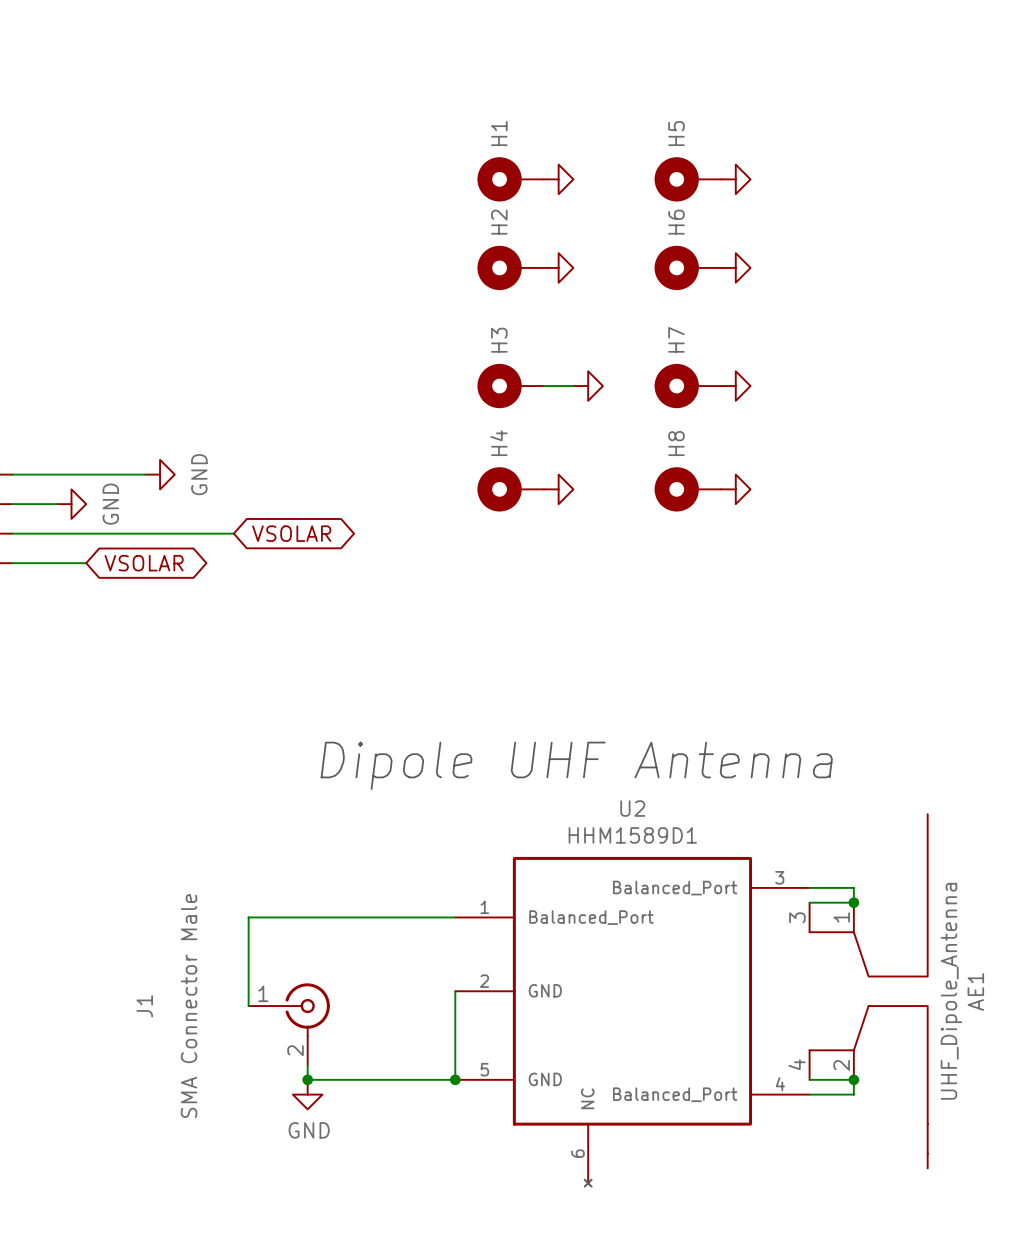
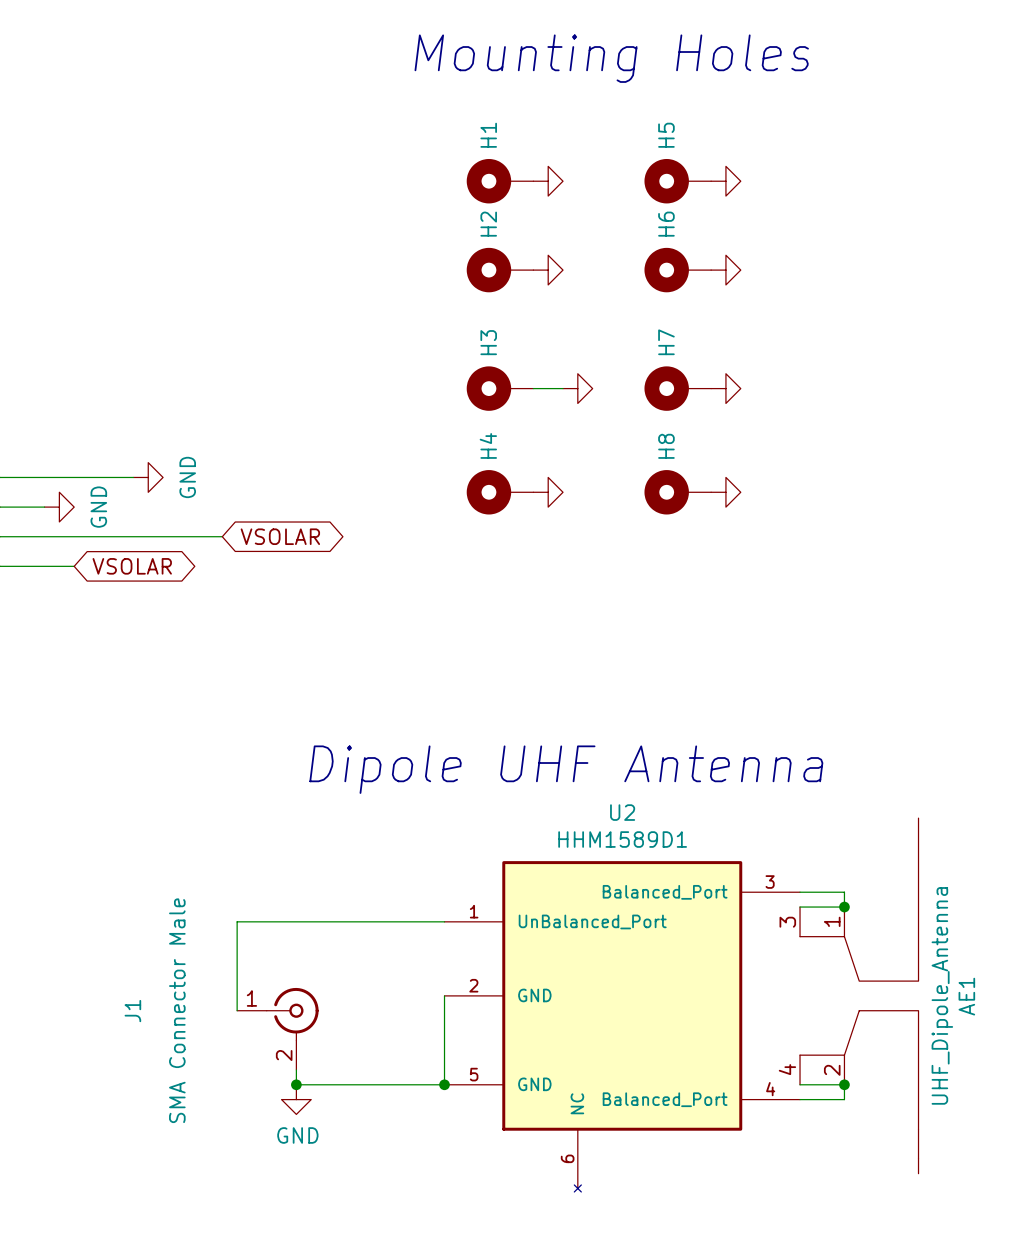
text: none -> Mounting Holes (611, 58)
U2 pin name: Balanced_Port (591, 917) -> UnBalanced_Port (592, 921)

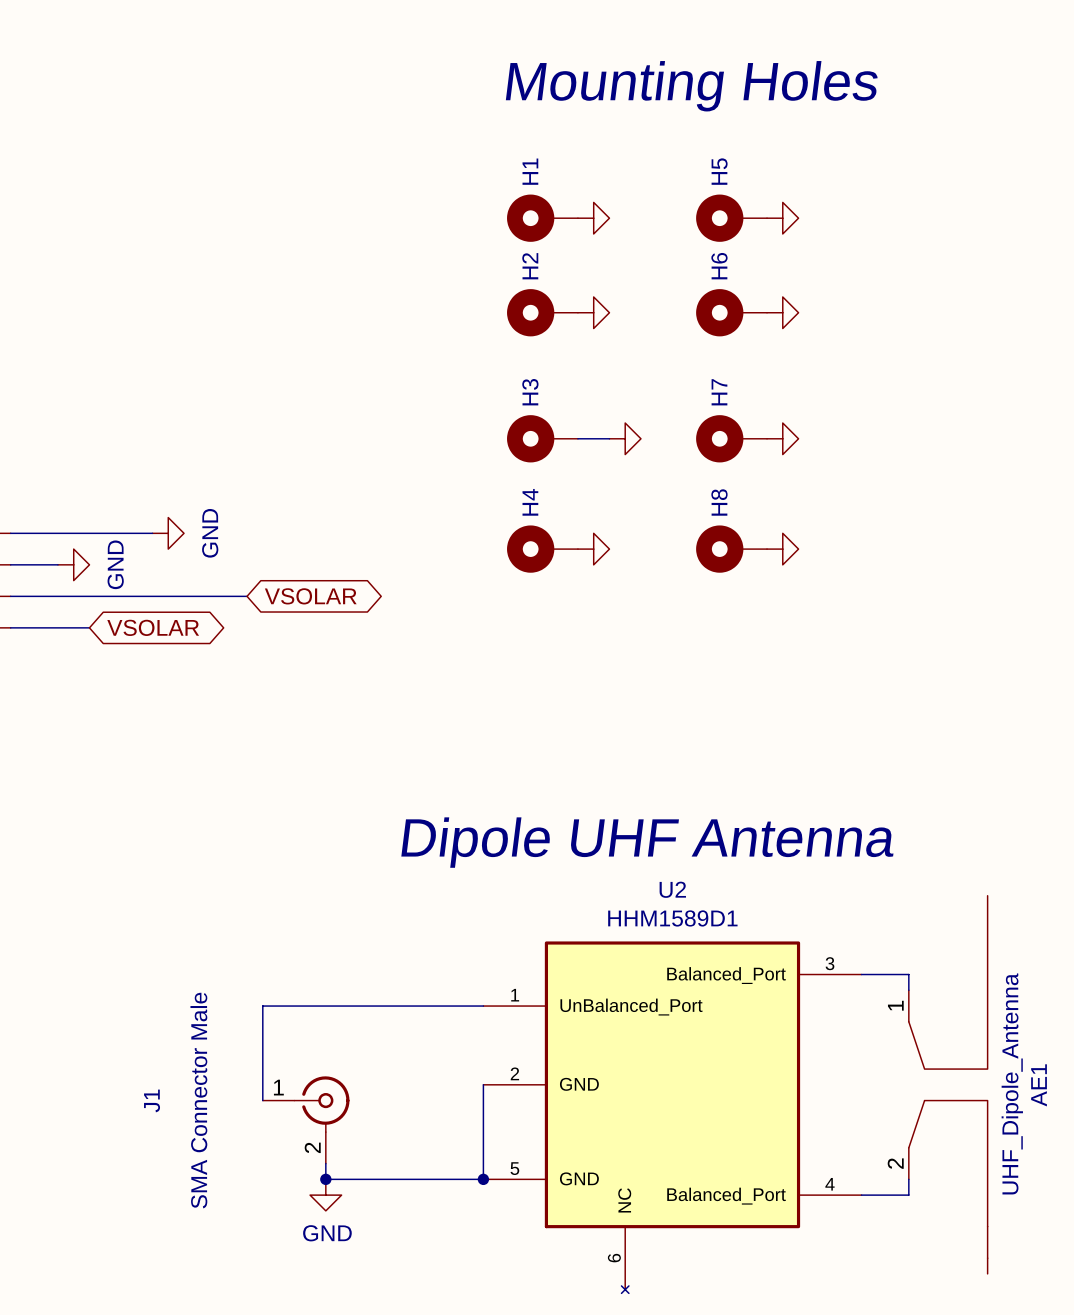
AE1 symbol: [800, 818, 919, 1174] -> [908, 895, 988, 1274]
wire: (800, 907) (844, 907) -> none
junction: (844, 907) -> none
wire: (800, 1084) (844, 1084) -> none
junction: (844, 1084) -> none

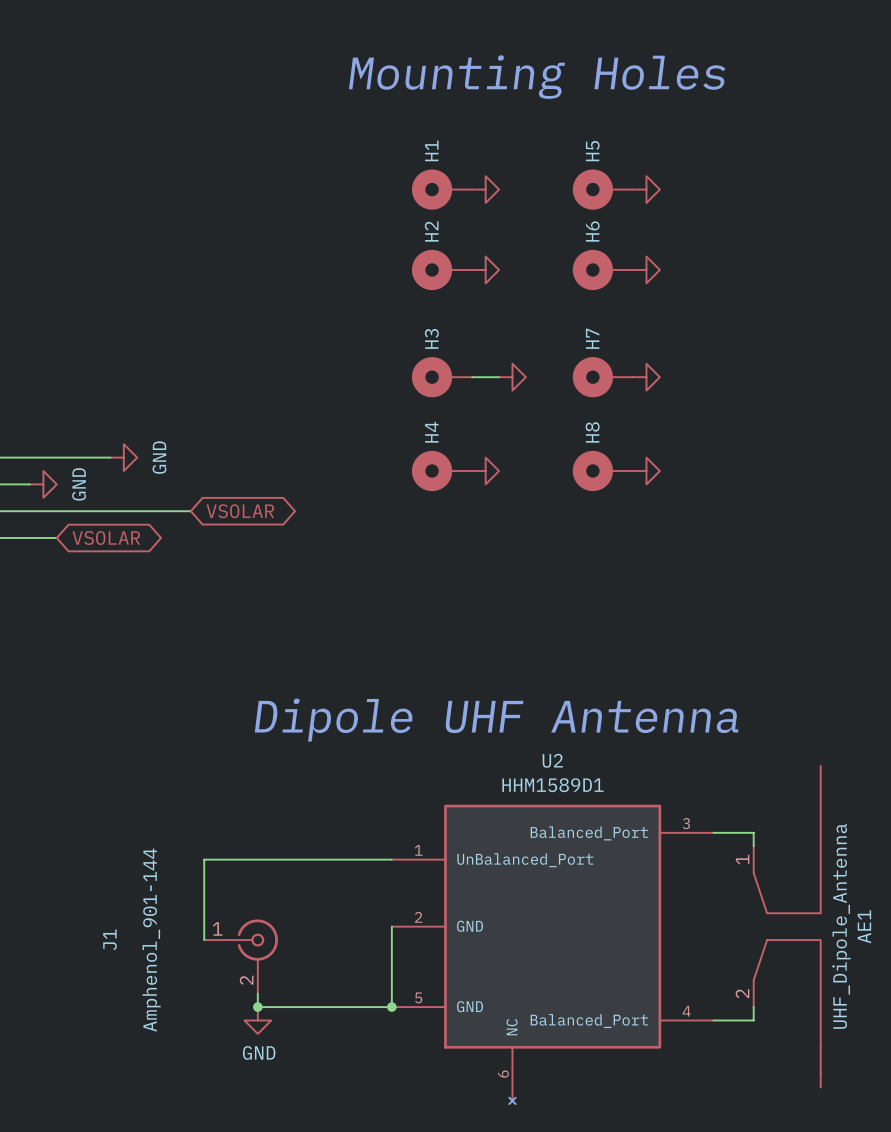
J1 value: SMA Connector Male (198, 1100) -> Amphenol_901-144 (151, 940)

